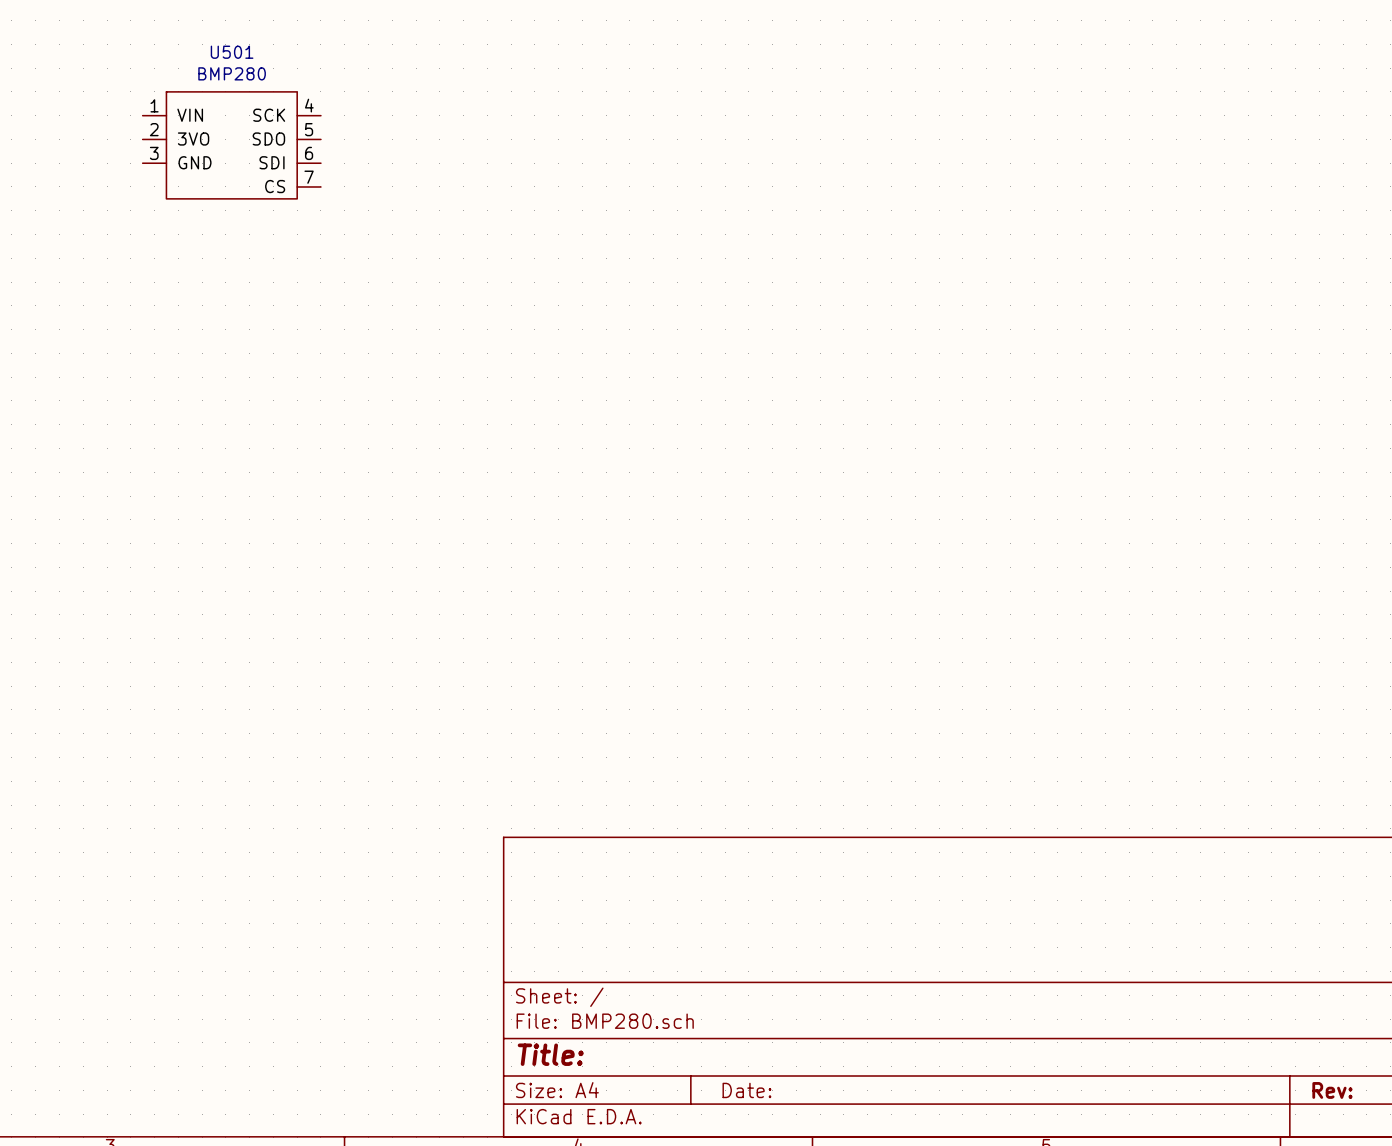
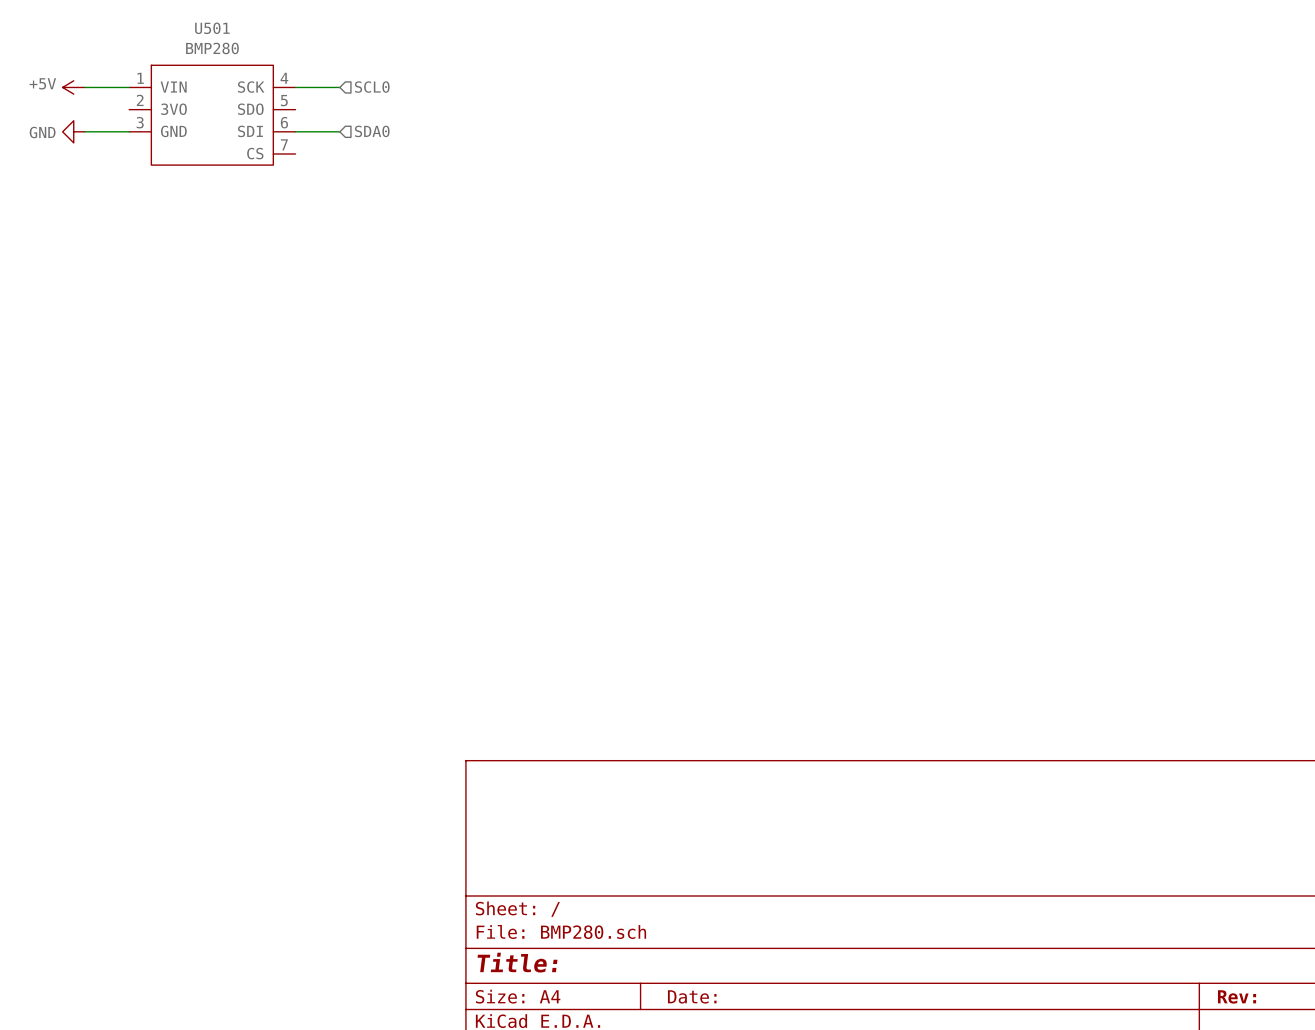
power symbol: none -> +5V (73, 87)
wire: none -> (84, 87) (129, 87)
wire: none -> (295, 87) (339, 87)
hierarchical label: none -> SCL0 (372, 87)
hierarchical label: none -> SDA0 (372, 131)
power symbol: none -> GND (73, 131)
wire: none -> (84, 131) (129, 131)
wire: none -> (295, 131) (339, 131)

